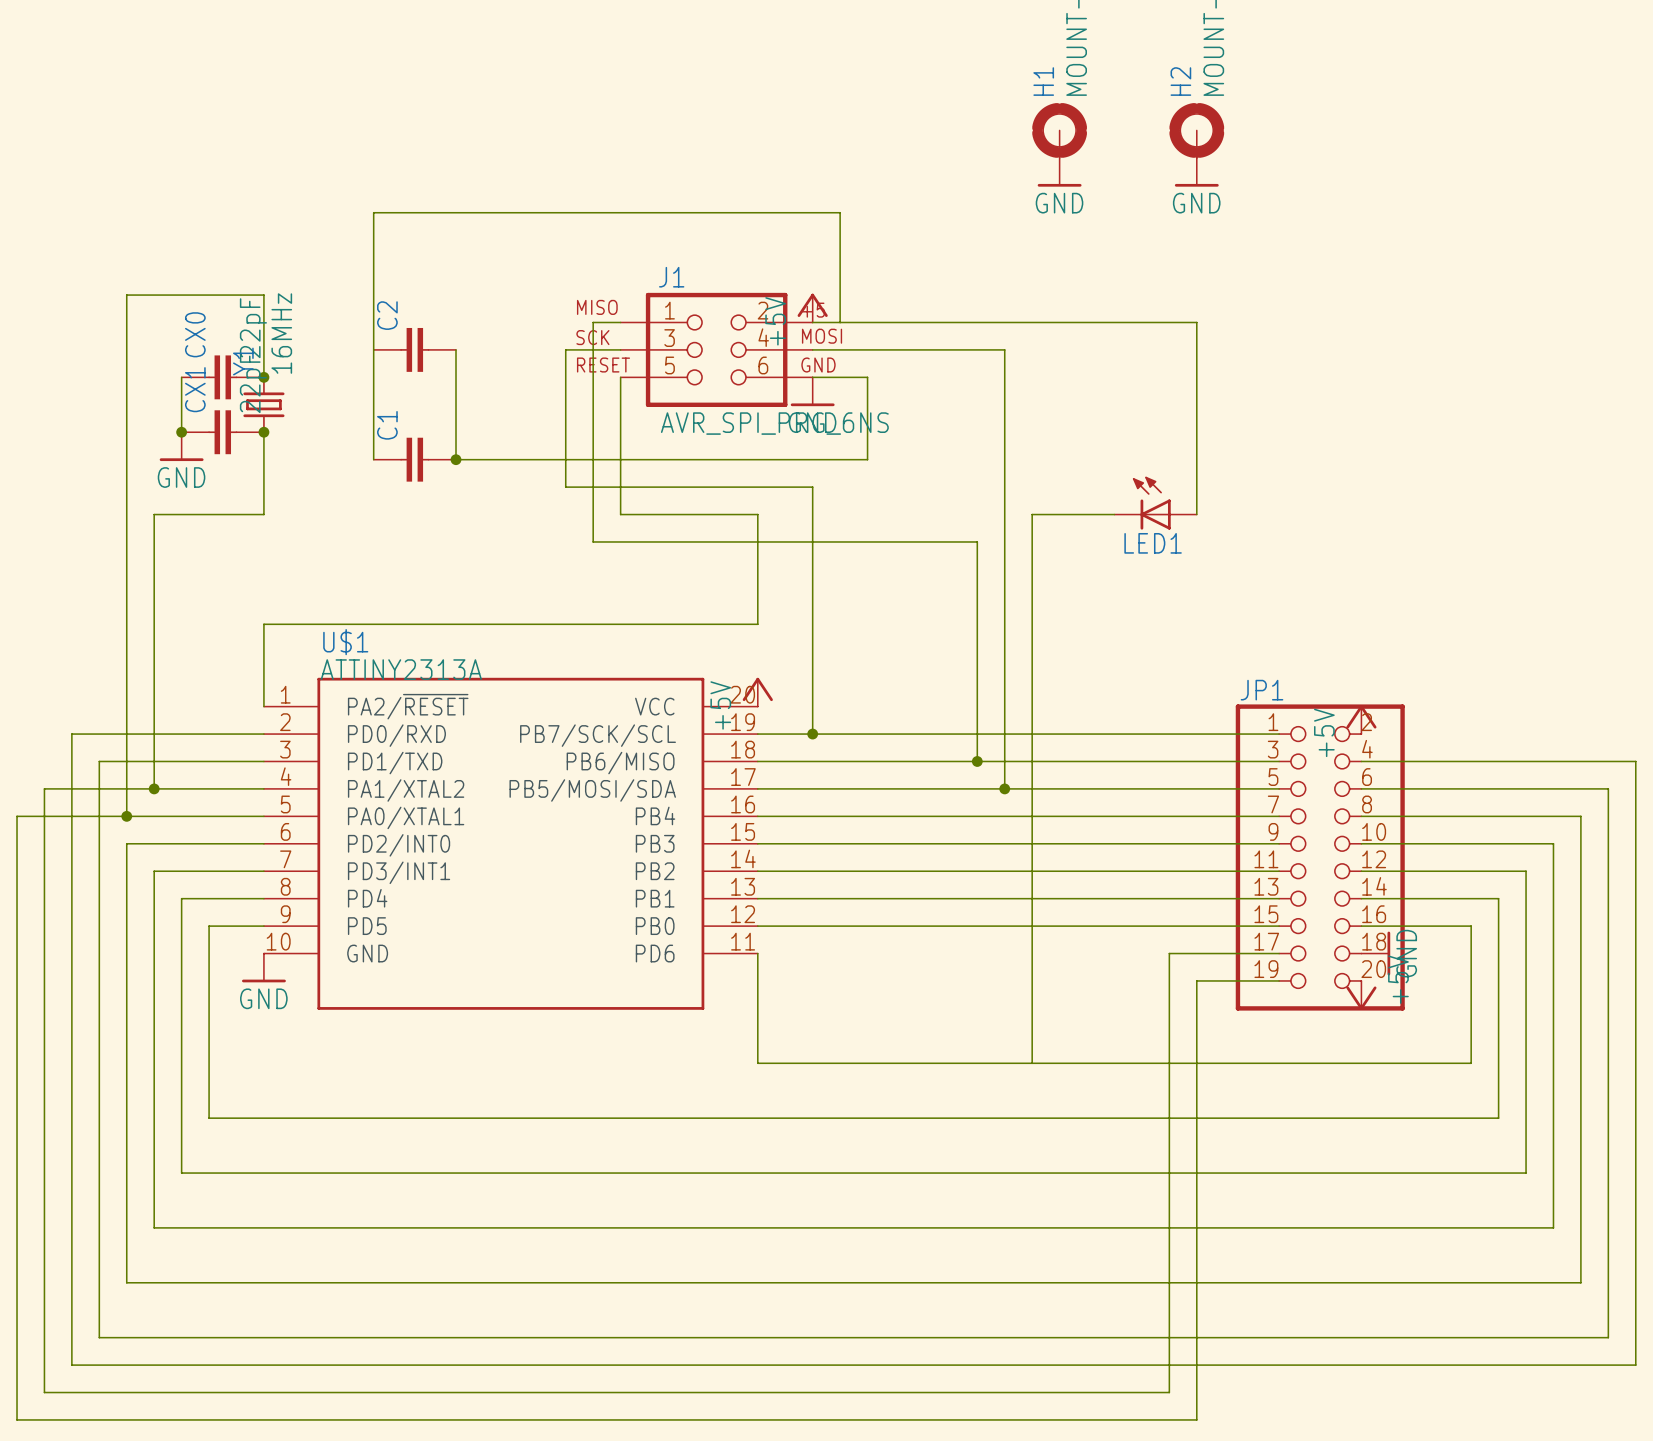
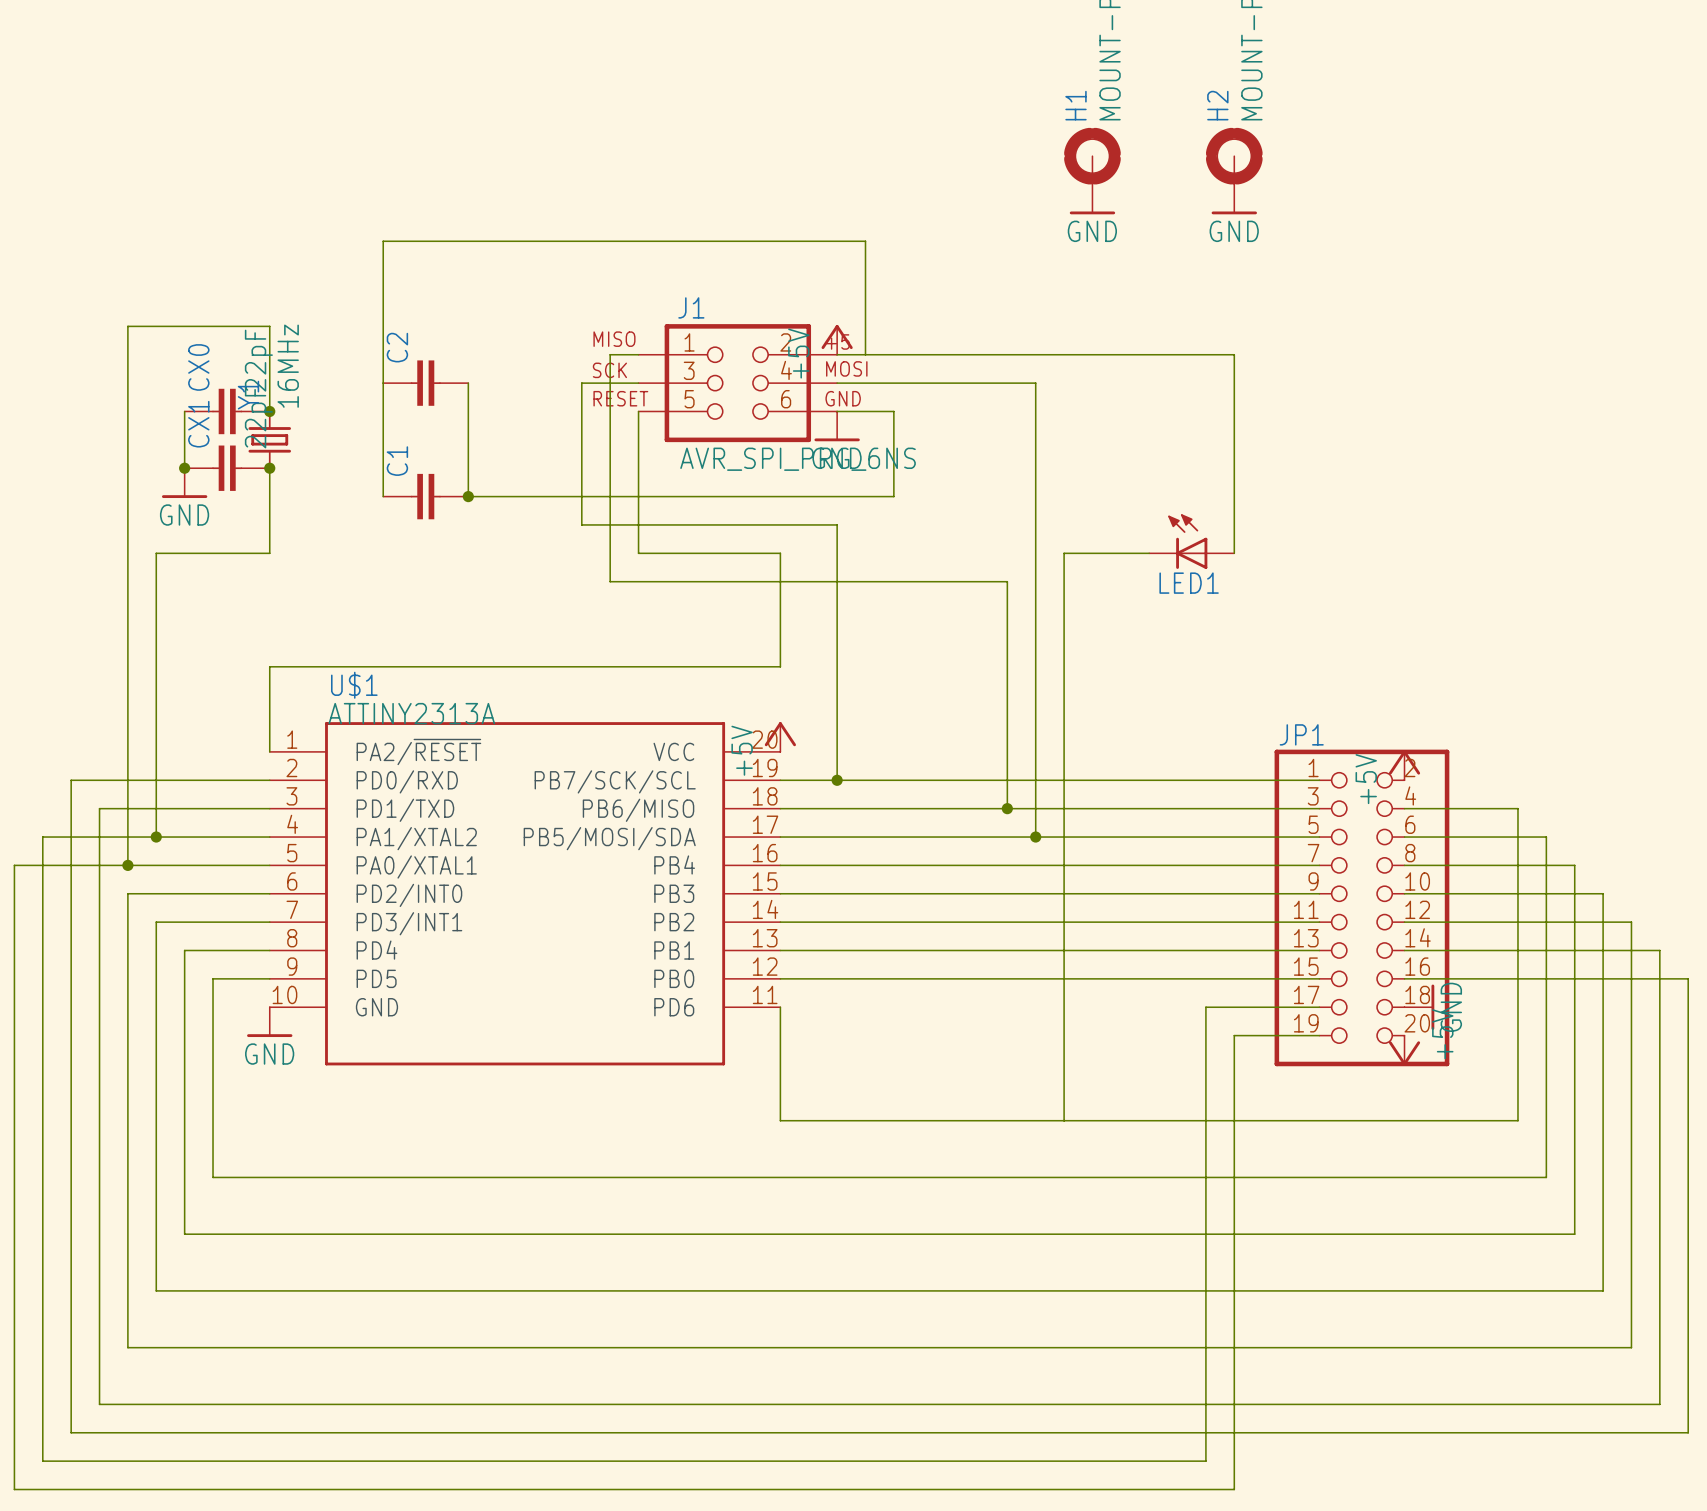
wire: (1471, 761) (1635, 761) (1635, 926) -> (1517, 808) (1517, 978) (1688, 978)
wire: (1498, 788) (1608, 788) (1608, 898) -> (1546, 837) (1546, 950) (1659, 950)
wire: (1526, 816) (1580, 816) (1580, 871) -> (1574, 865) (1574, 922) (1631, 922)

